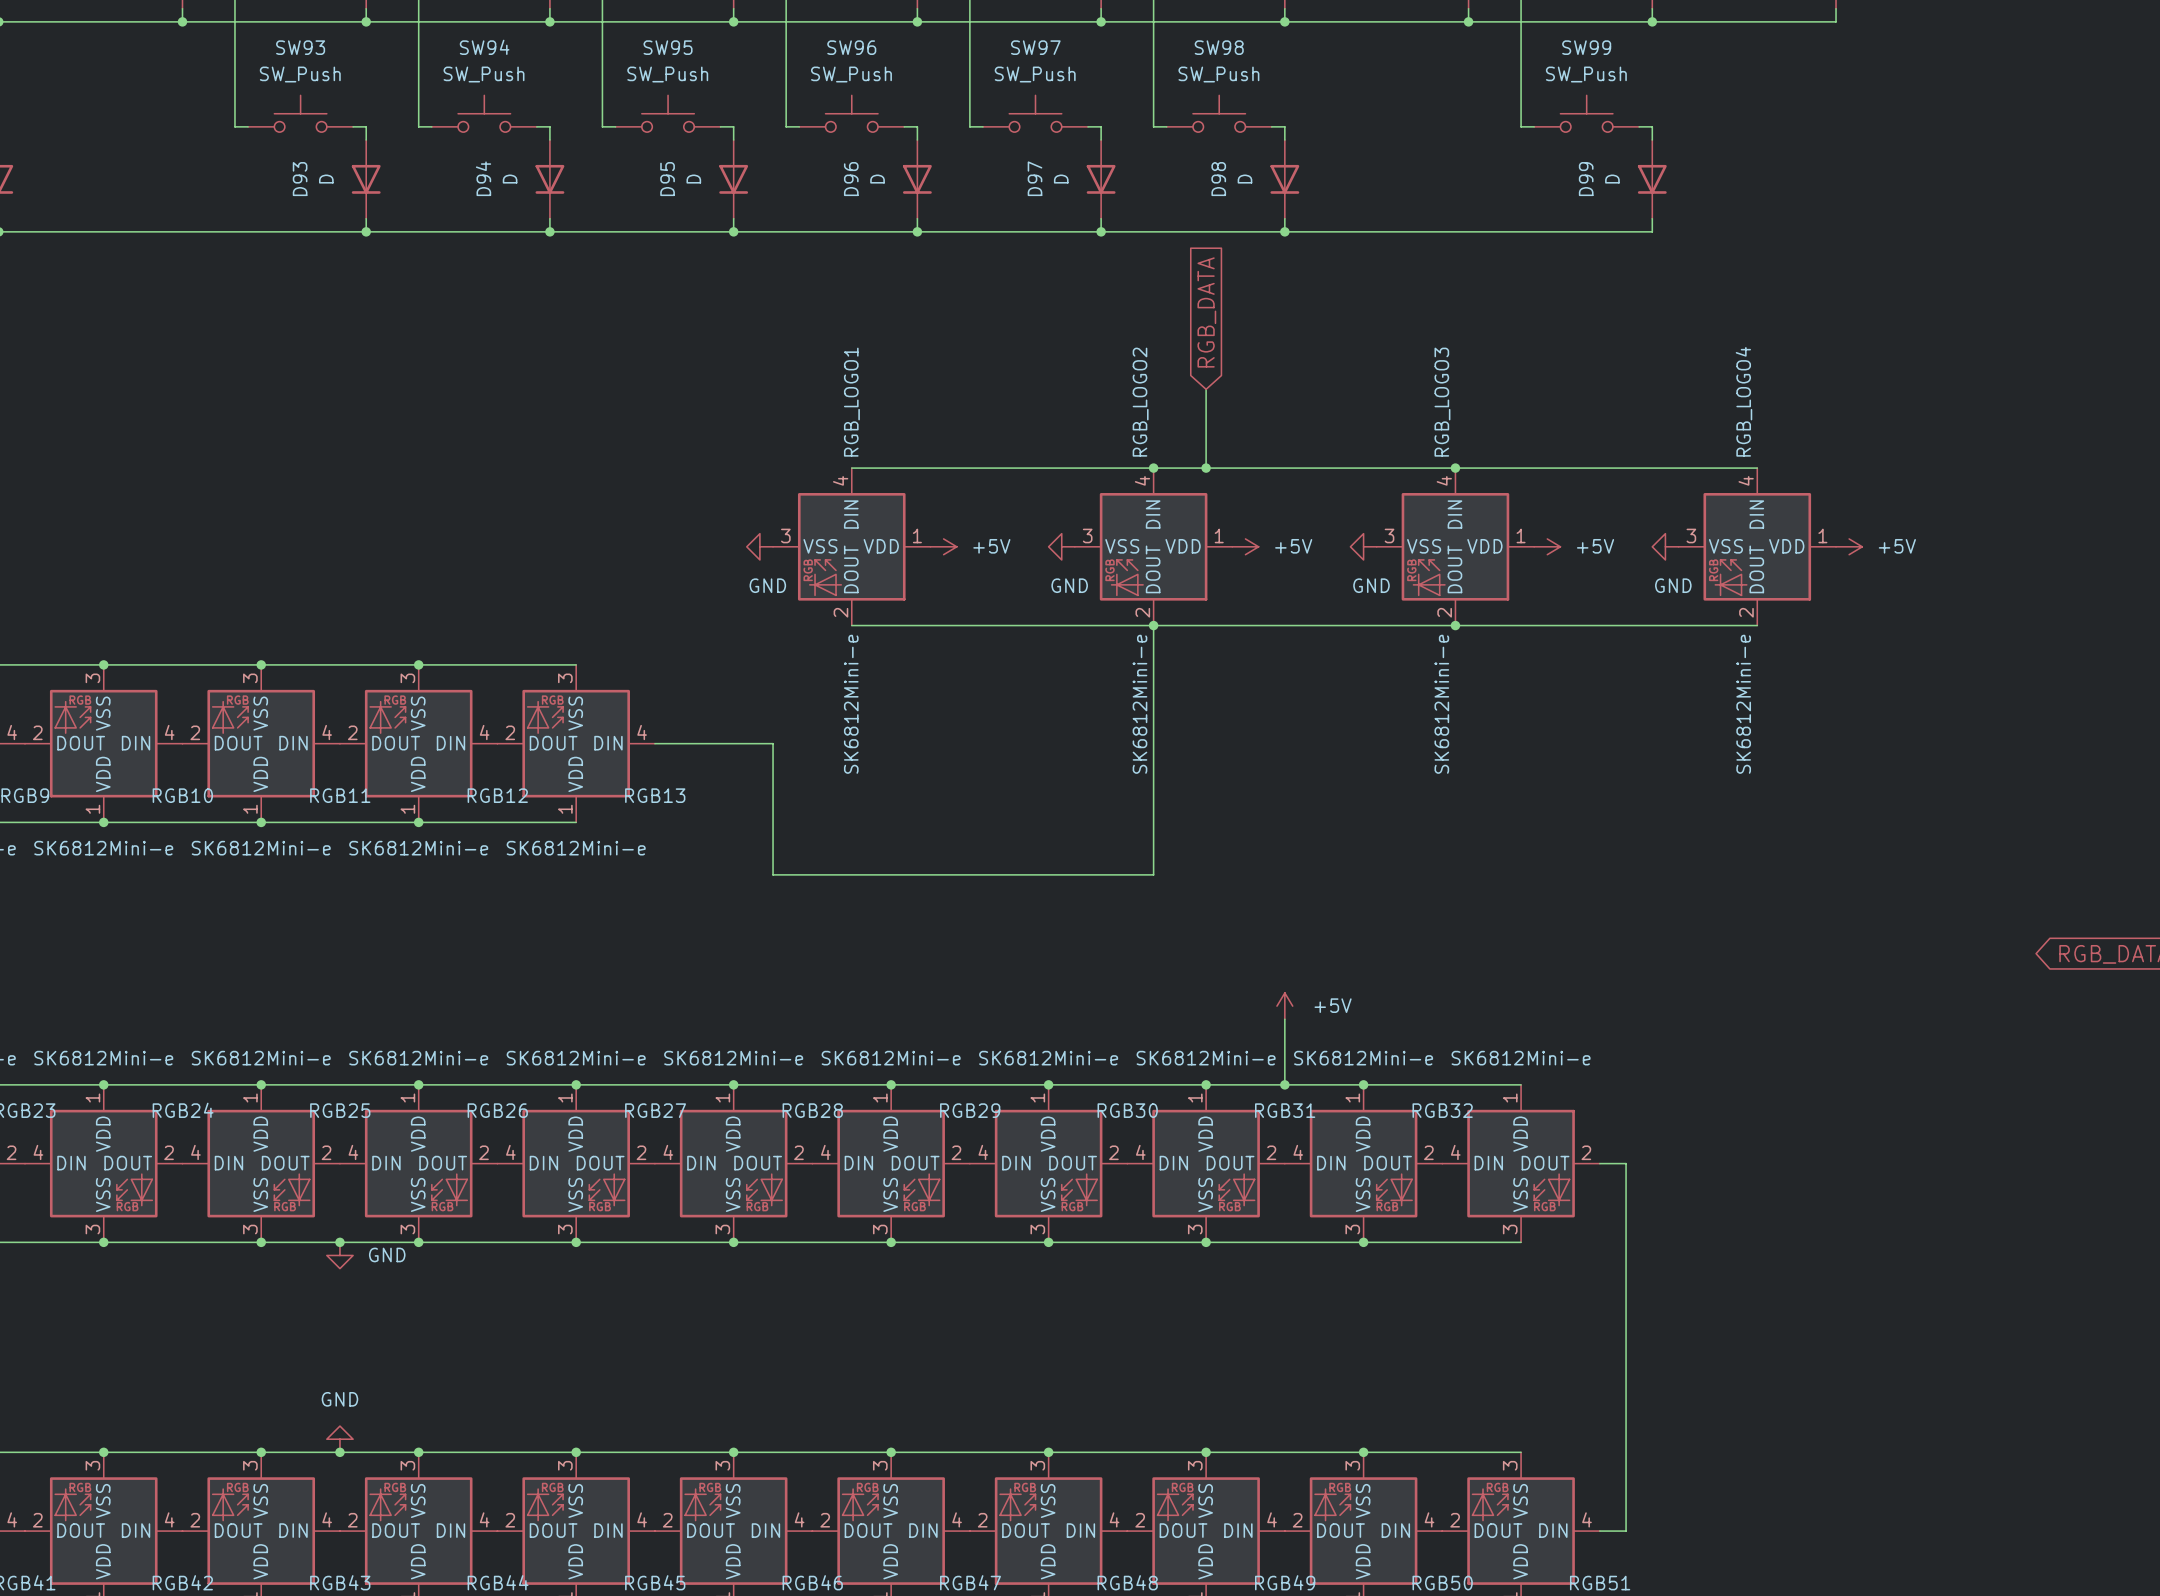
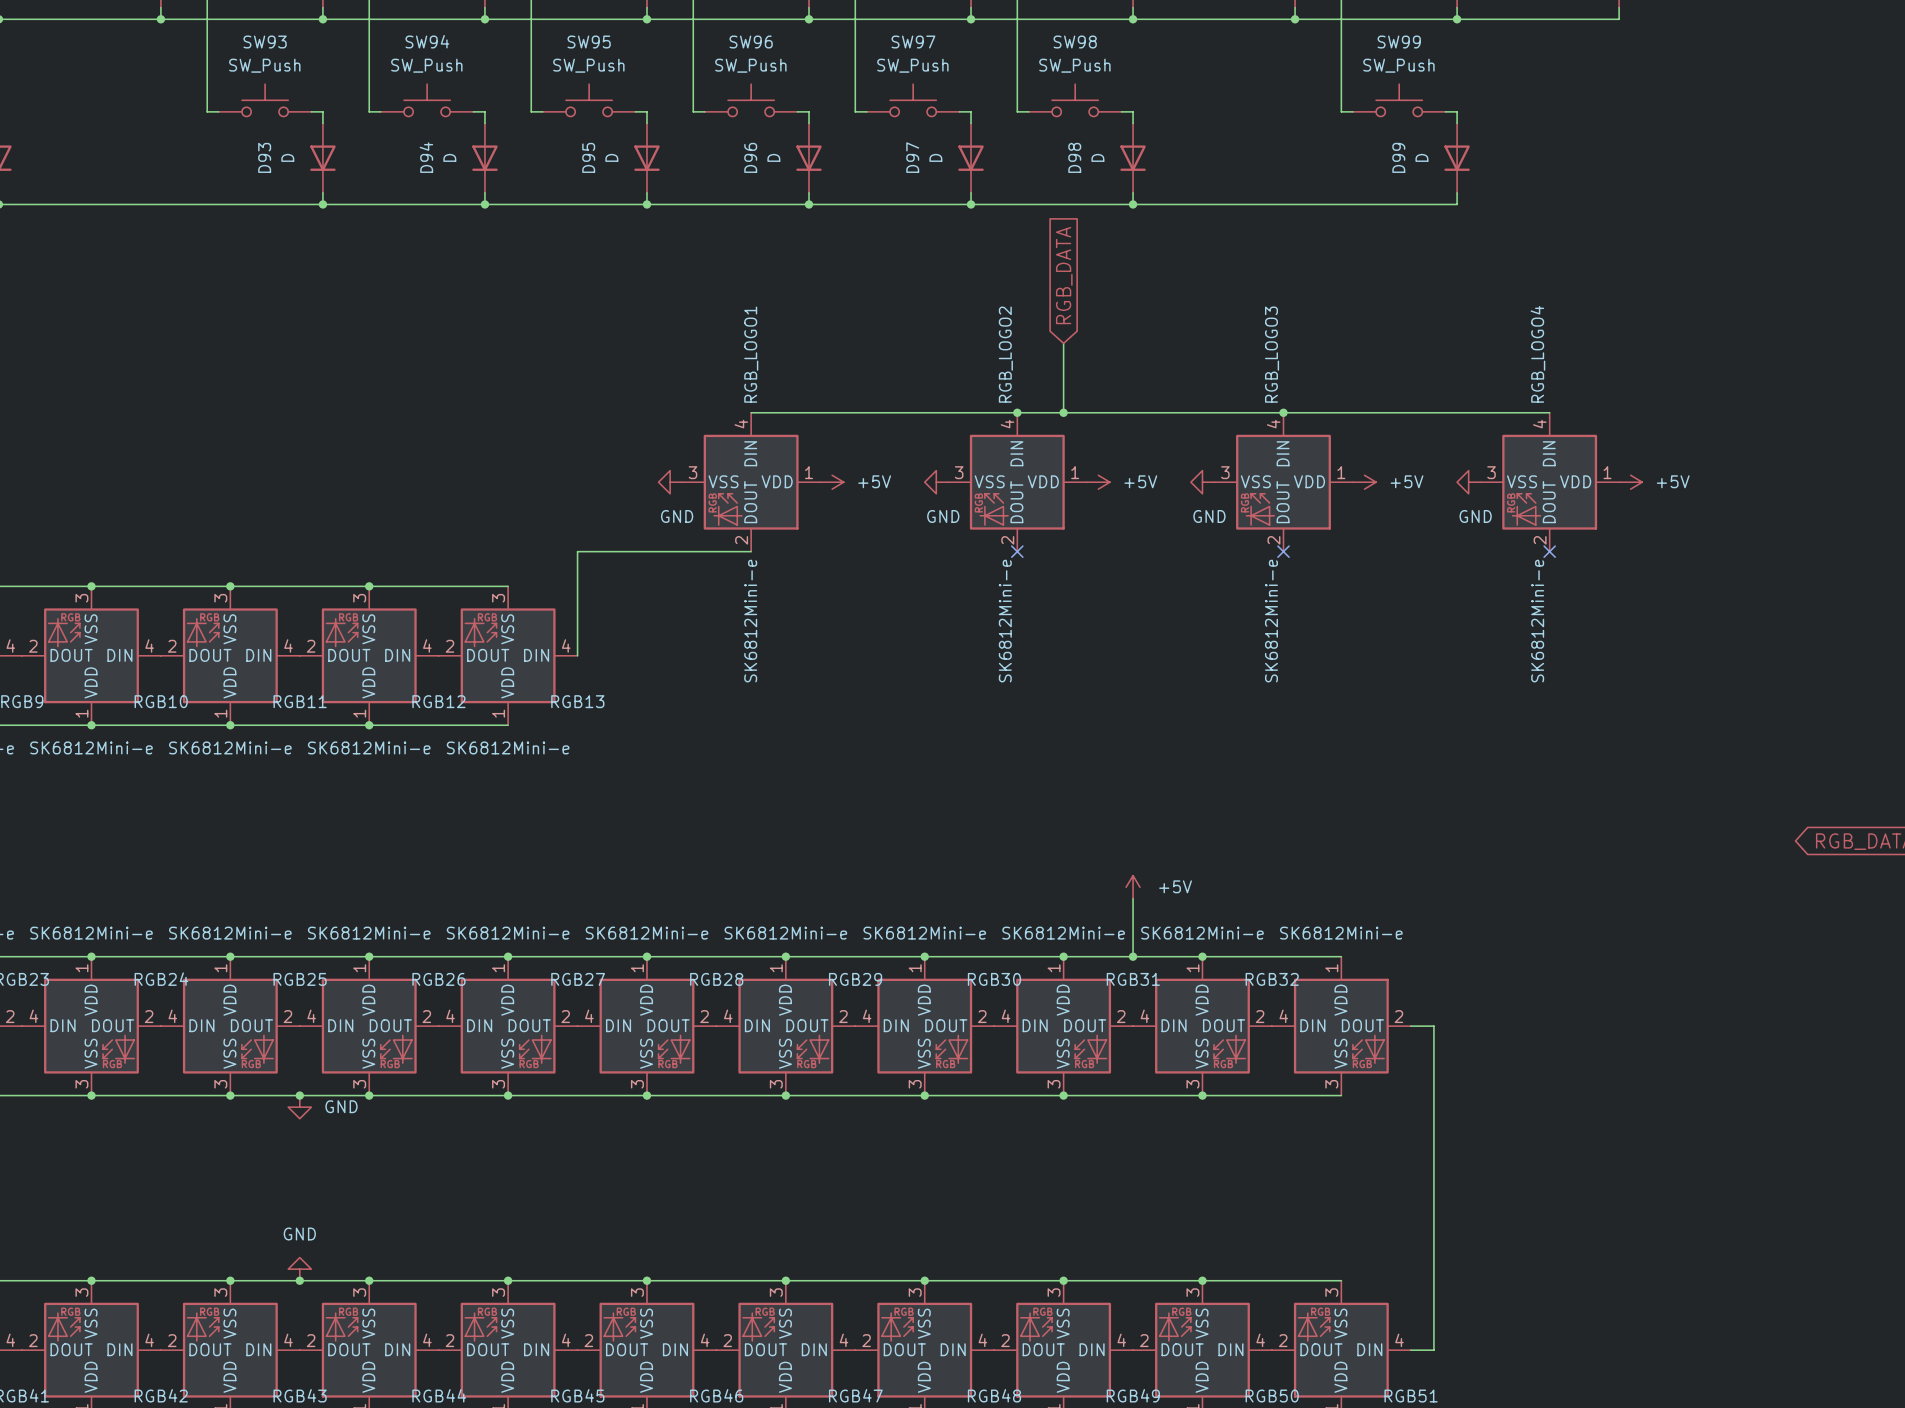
wire: (851, 625) (1757, 625) -> none
wire: (1153, 625) (1153, 874) (773, 874) (773, 743) (654, 743) -> (751, 551) (577, 551) (577, 655)
junction: (1153, 625) -> none
no-connect mark: none -> (1017, 551)
junction: (1455, 625) -> none
no-connect mark: none -> (1283, 551)
no-connect mark: none -> (1549, 551)

